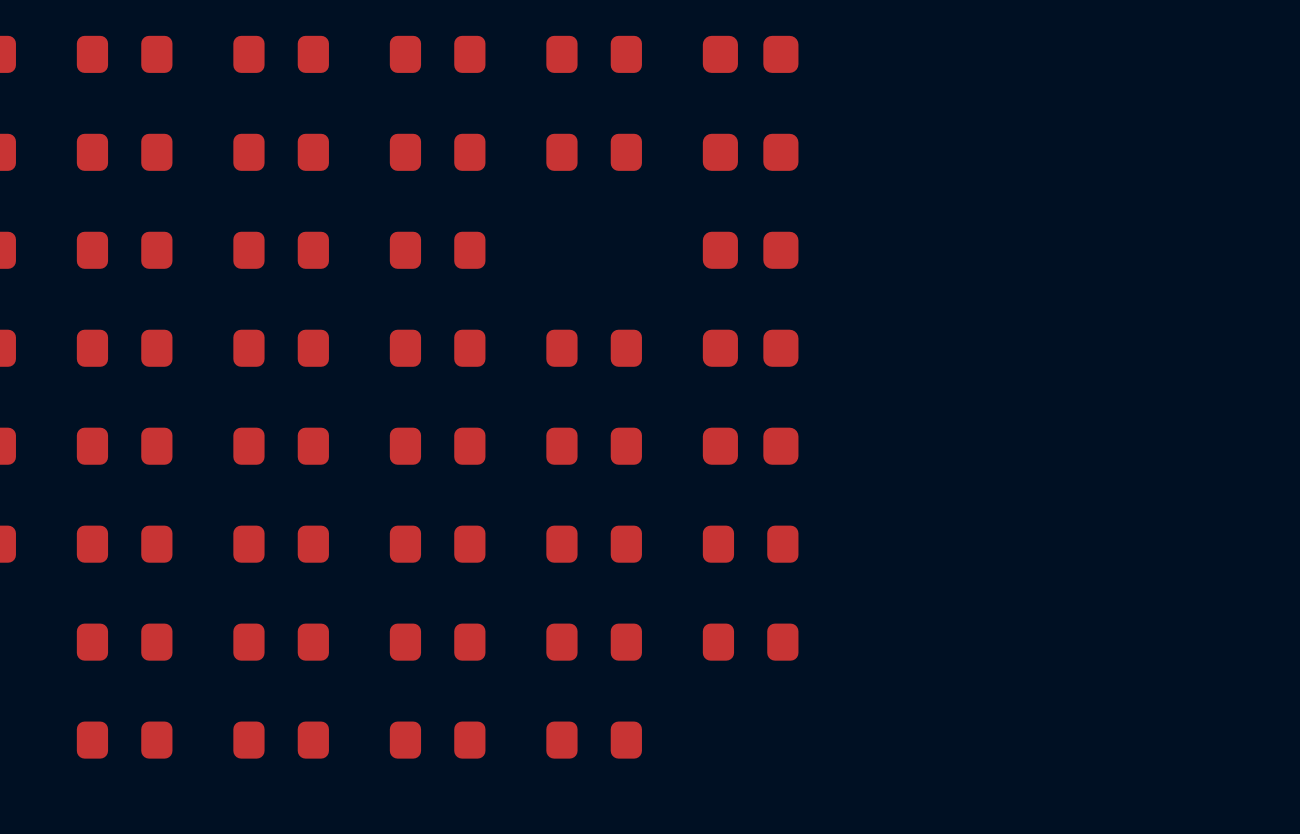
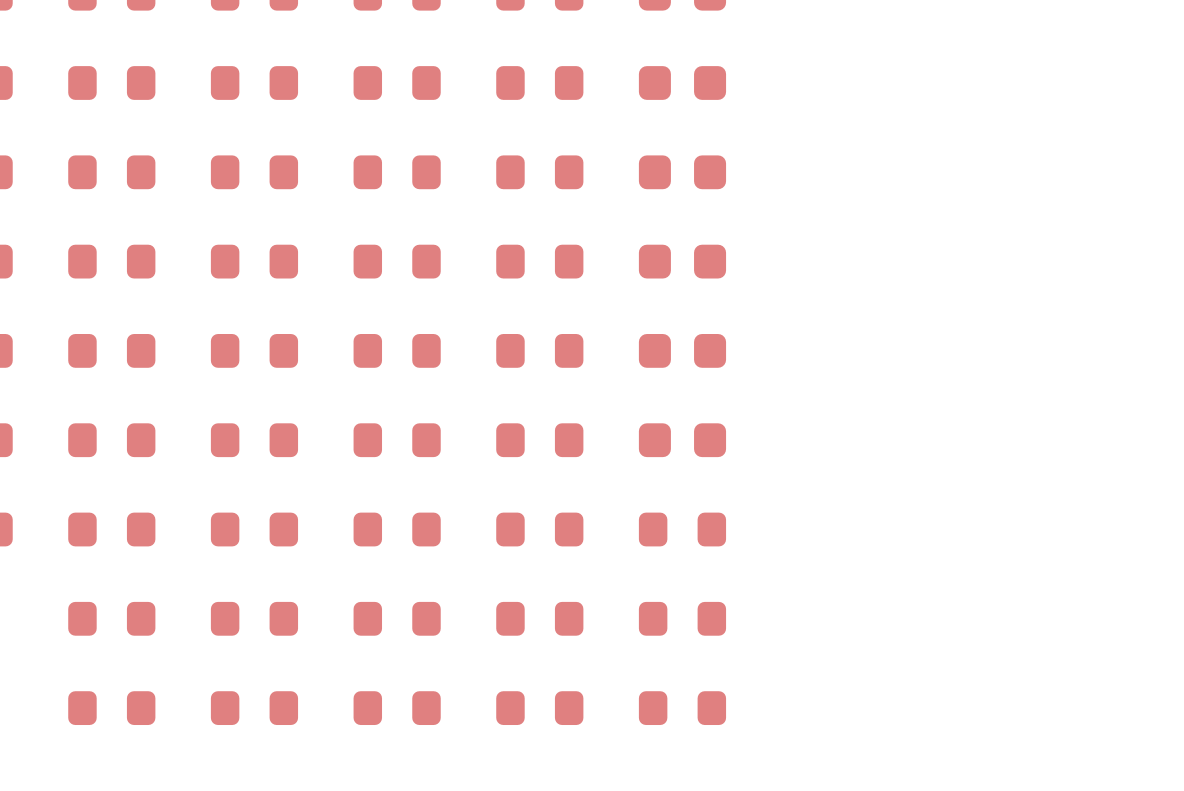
part: none -> (539, 261)
part: none -> (682, 708)

